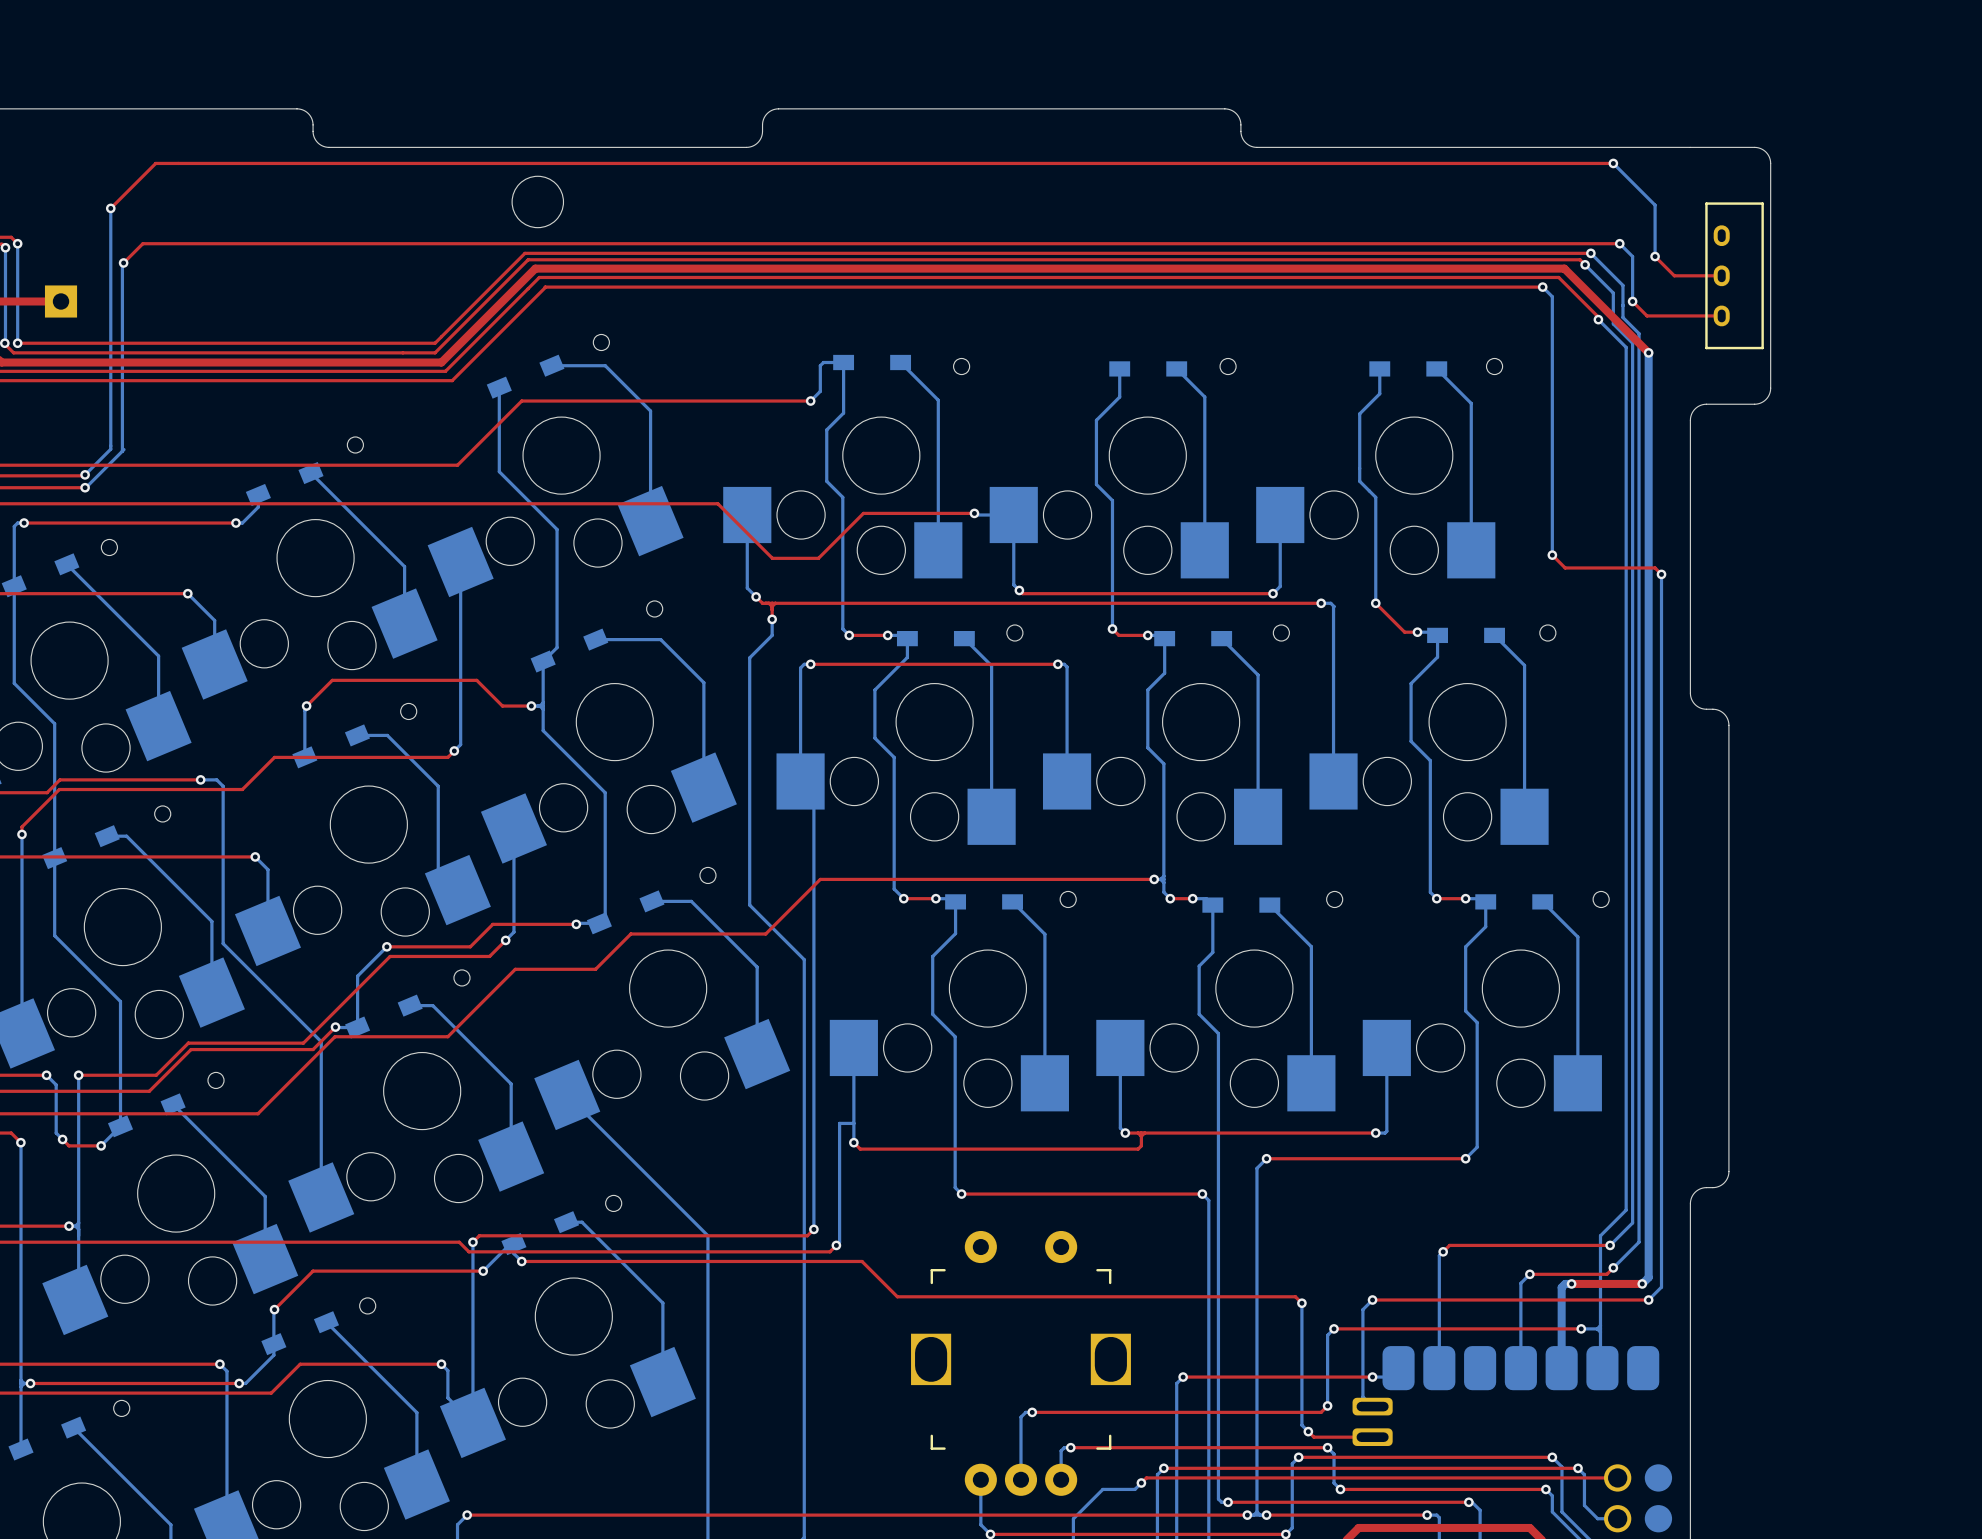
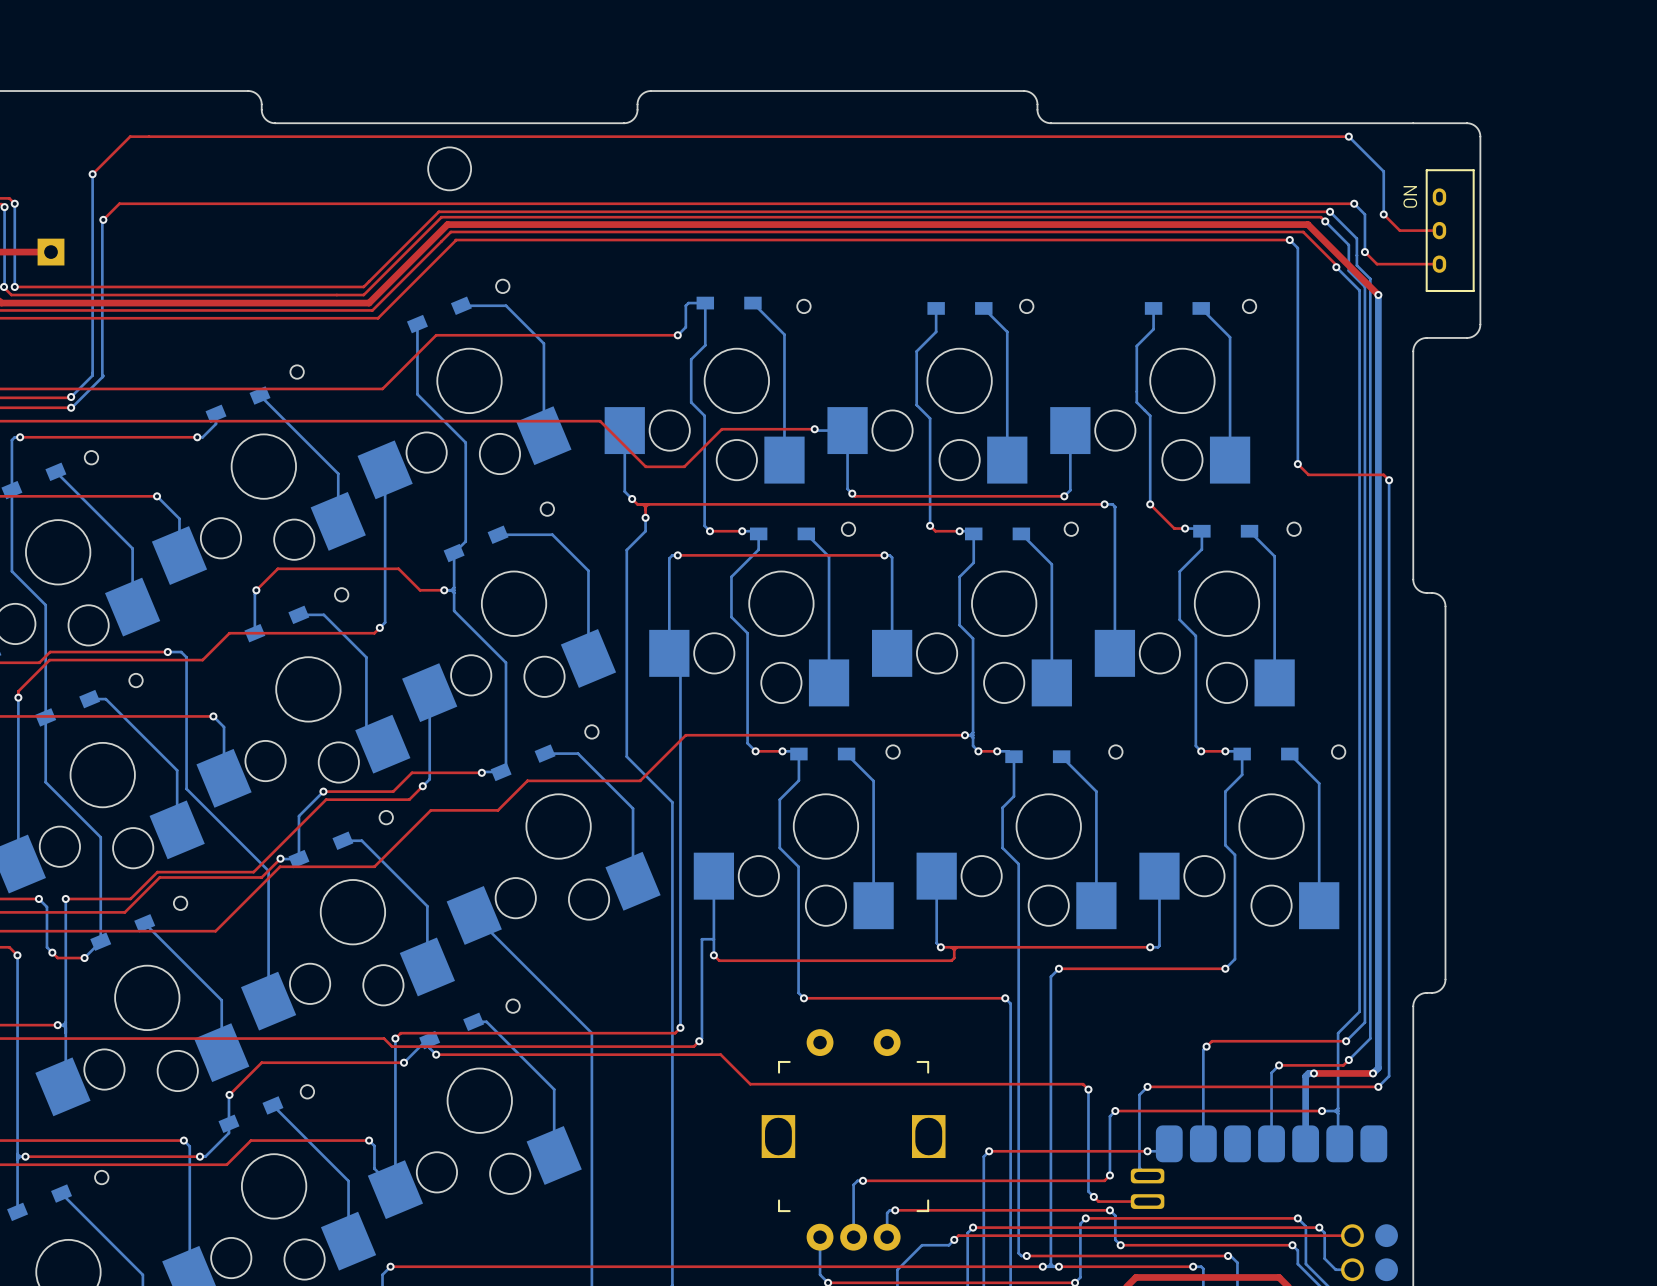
text: none -> ON (1410, 196)

